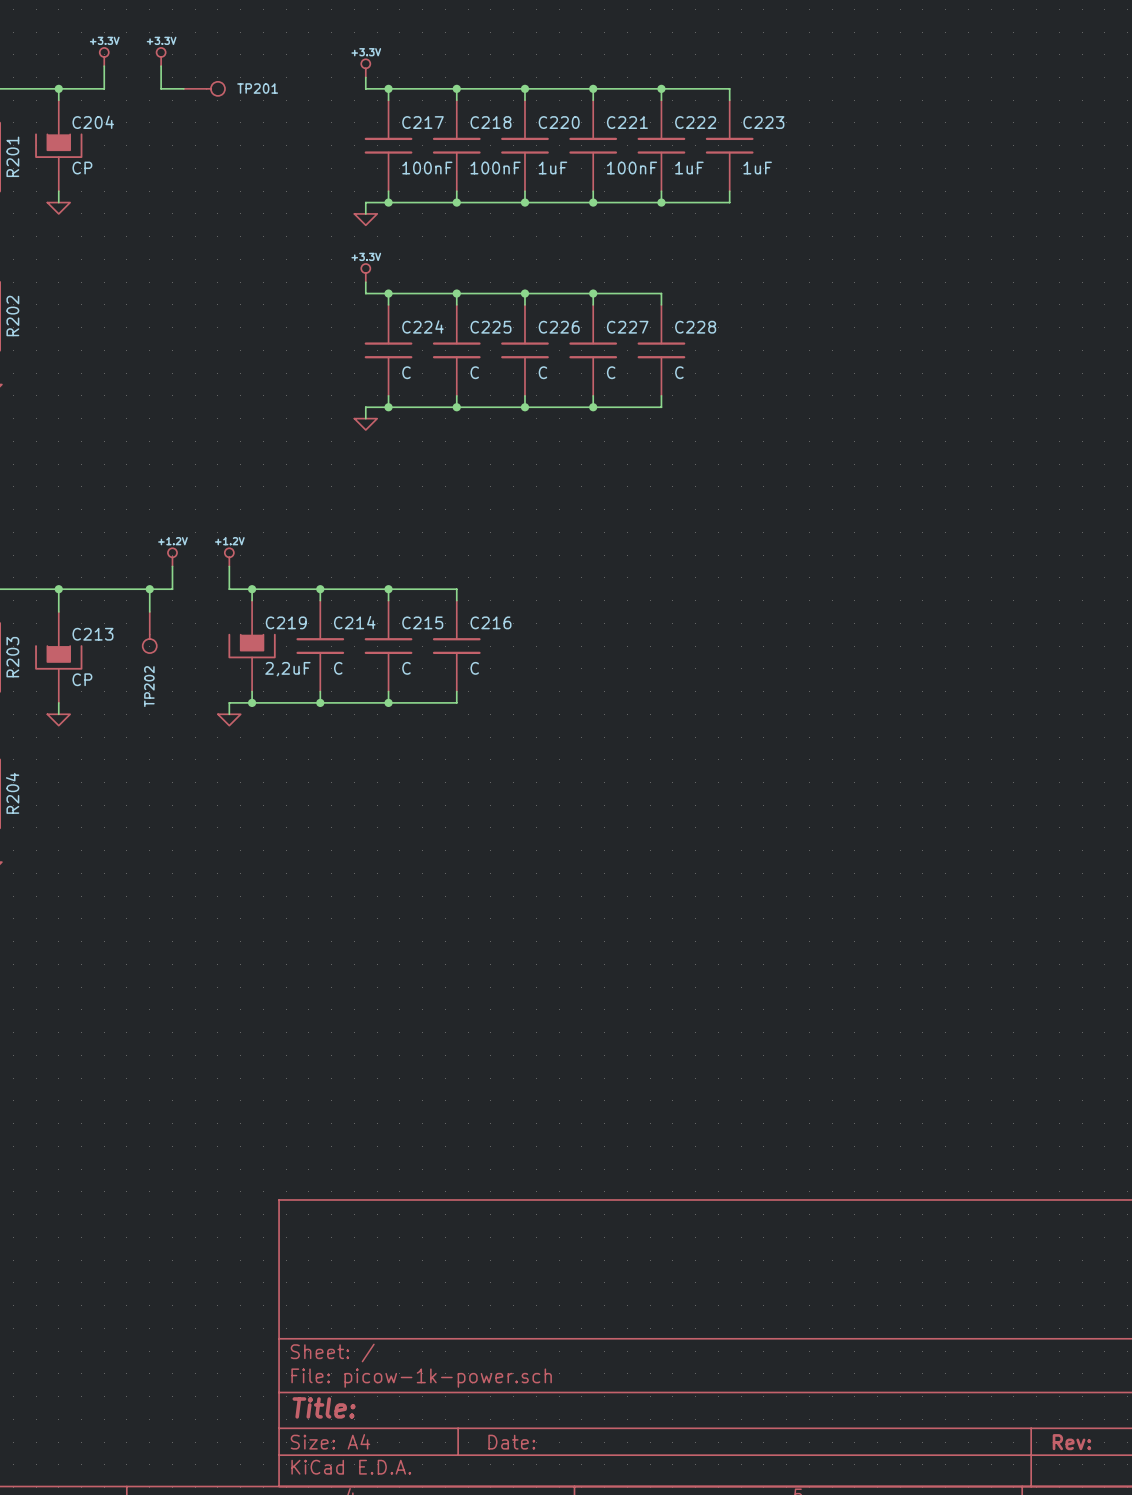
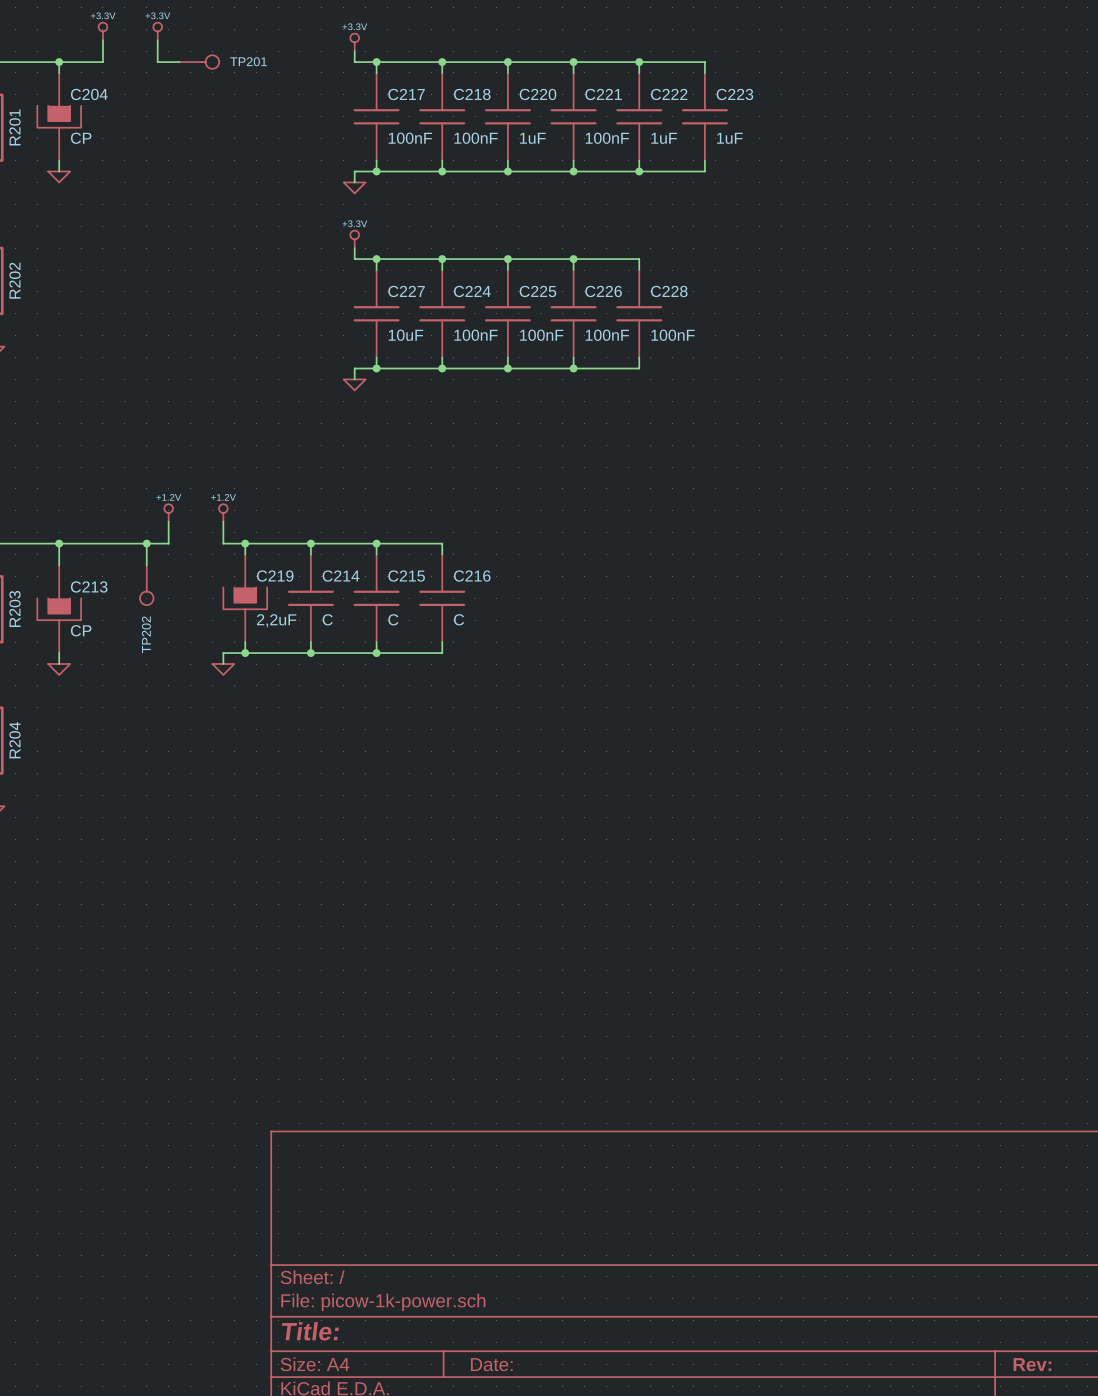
C224 name: C224 (423, 326) -> C227 (406, 291)
C225 name: C225 (490, 327) -> C224 (472, 291)
C226 name: C226 (559, 327) -> C225 (537, 291)
C227 name: C227 (627, 327) -> C226 (603, 291)
C224 value: C (406, 372) -> 10uF (405, 335)
C225 value: C (474, 372) -> 100nF (476, 335)
C226 value: C (542, 372) -> 100nF (541, 335)
C227 value: C (611, 372) -> 100nF (607, 335)
C228 value: C (679, 372) -> 100nF (673, 335)

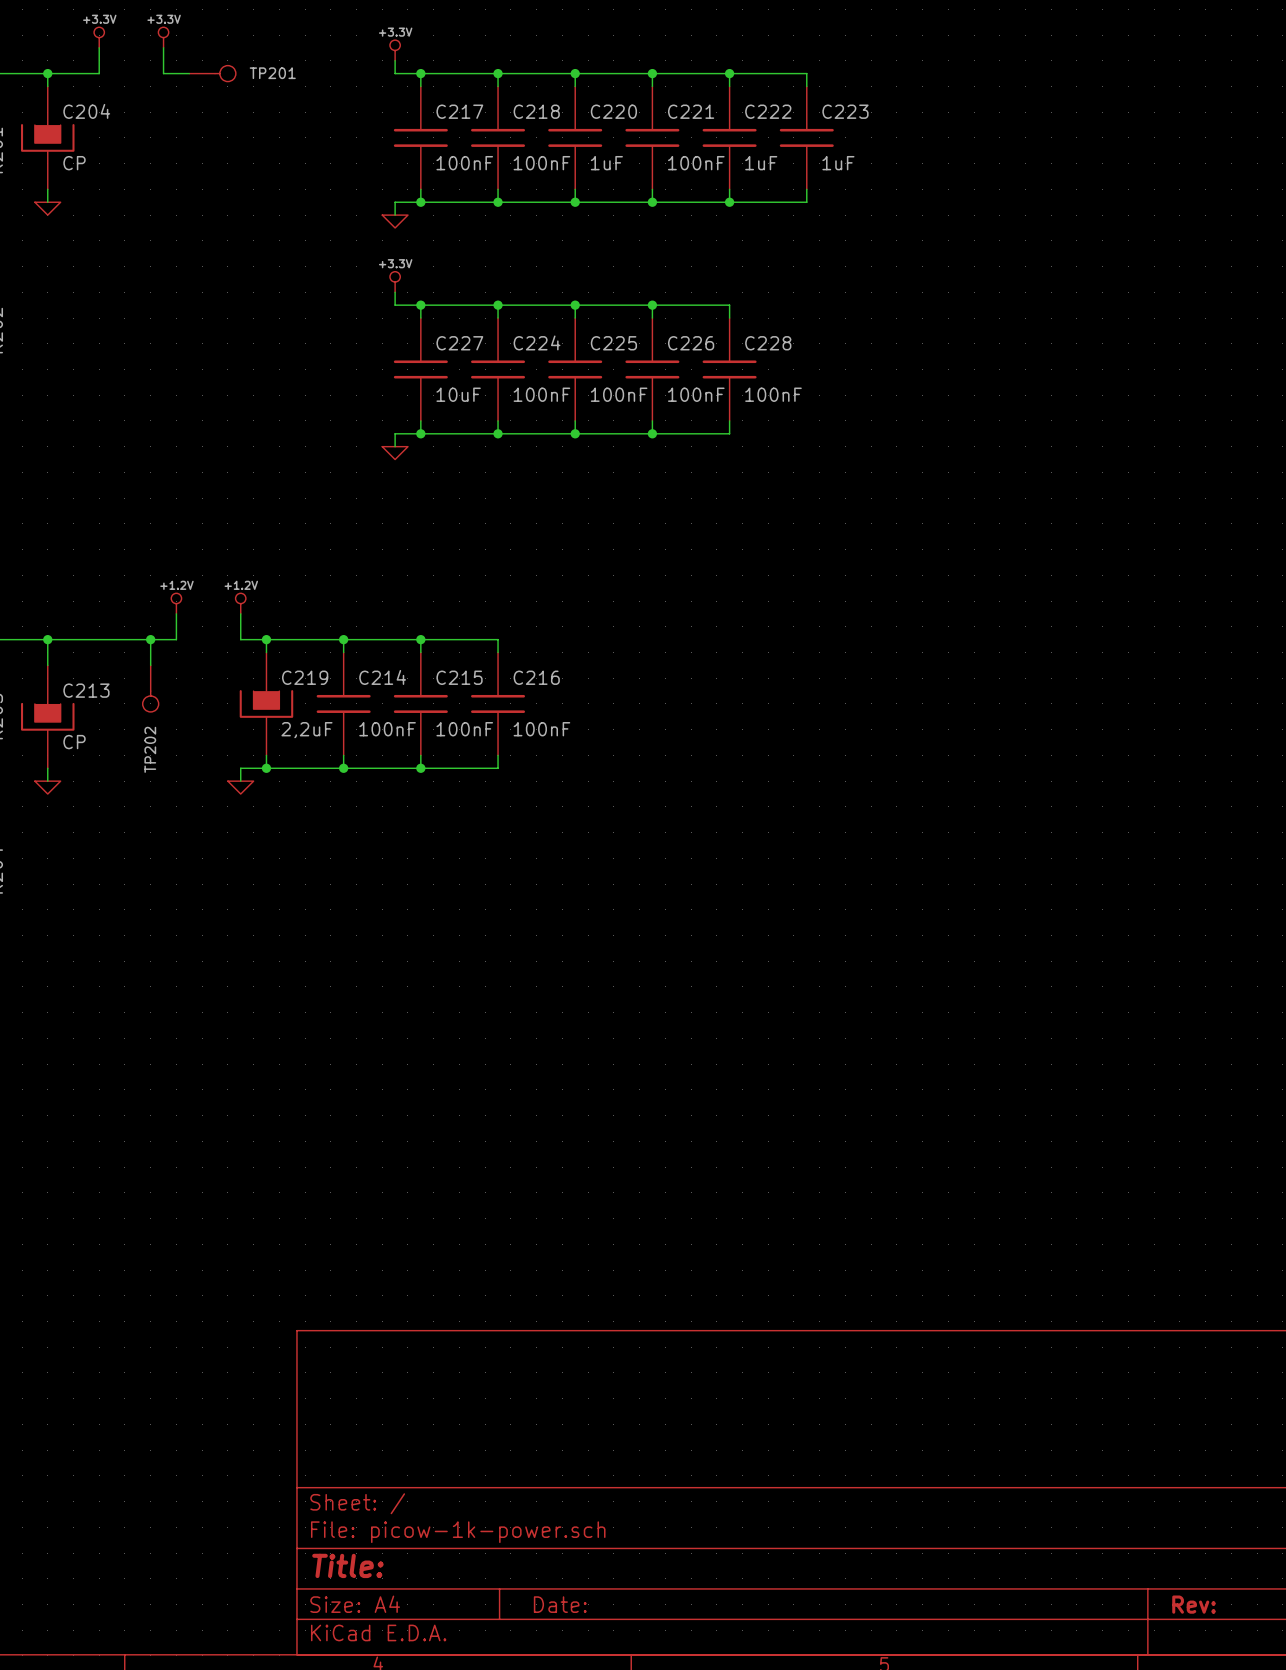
C214 value: C (327, 619) -> 100nF (387, 729)
C215 value: C (393, 619) -> 100nF (464, 729)
C216 value: C (459, 619) -> 100nF (541, 729)

